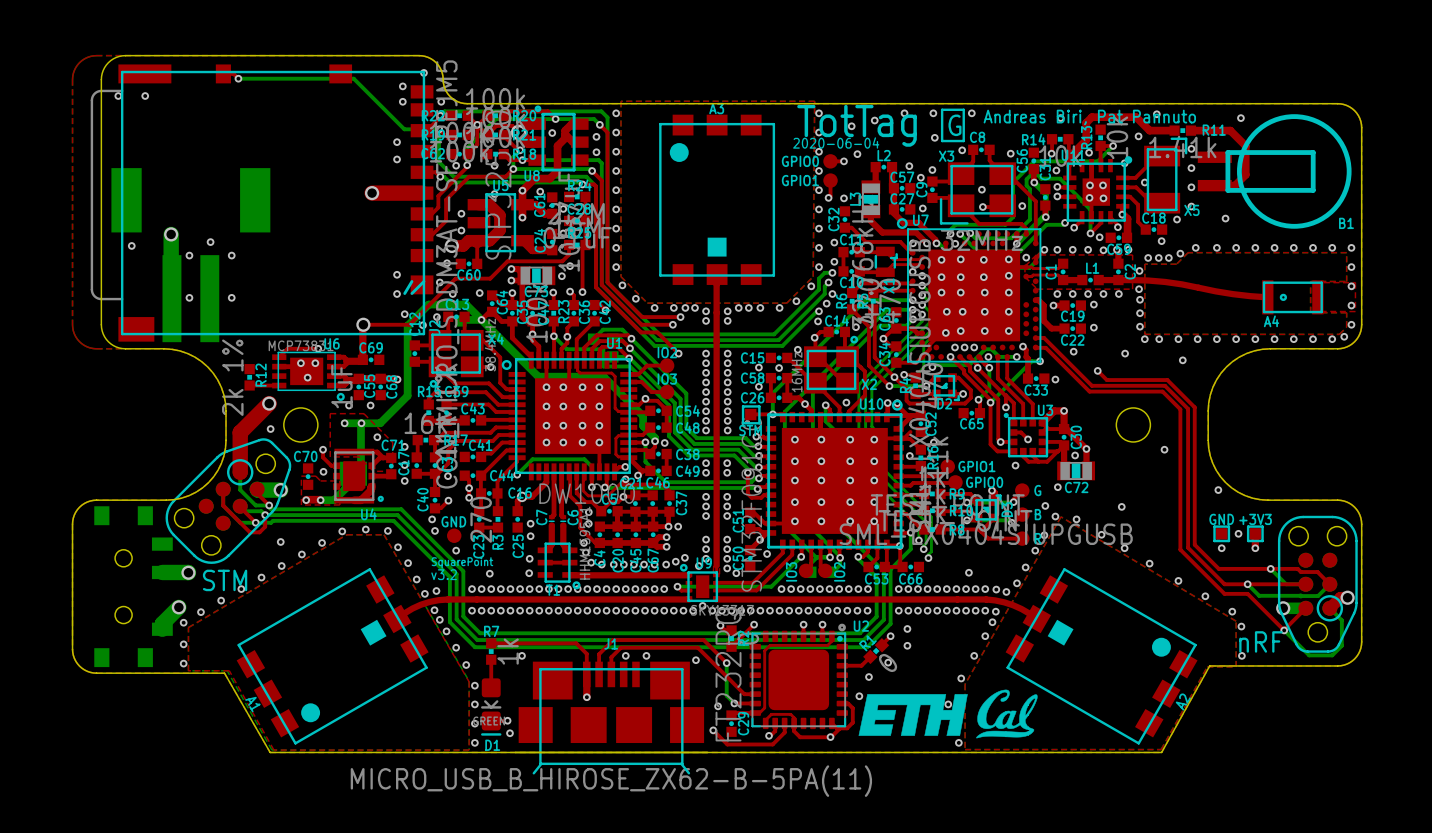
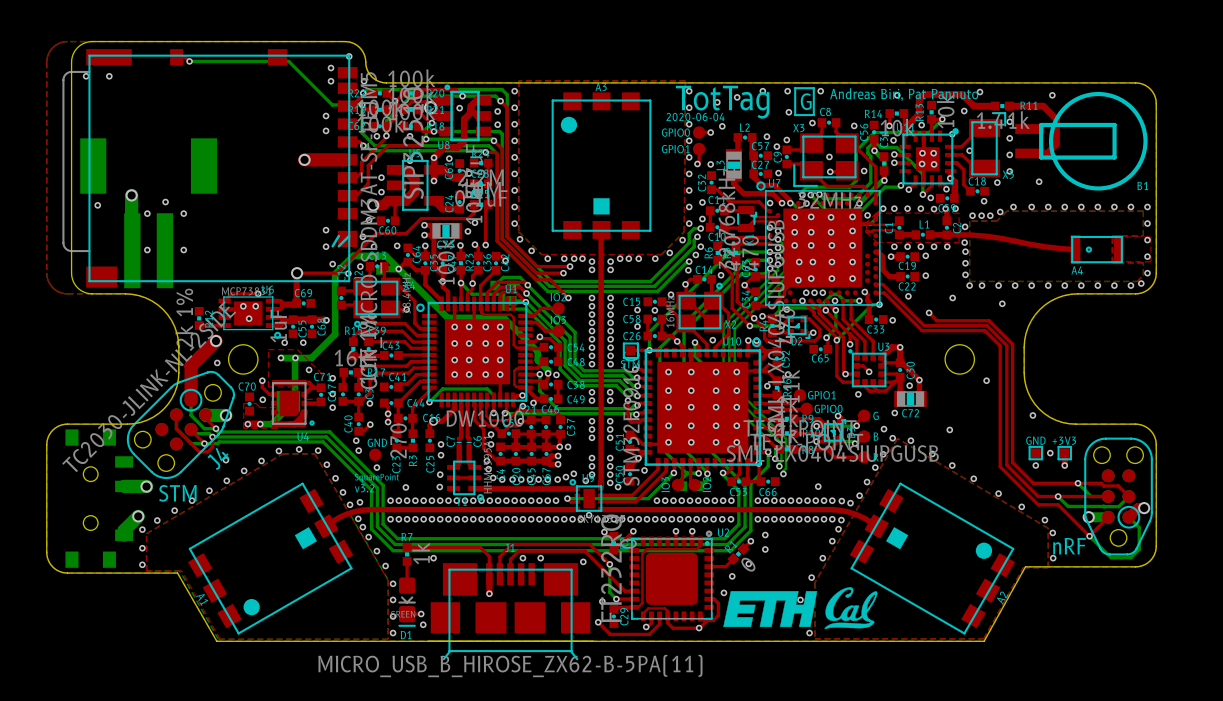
J4 value: none -> TC2030-JLINK-NL-2SIDE (149, 386)
J4 name: none -> J4 (218, 458)

